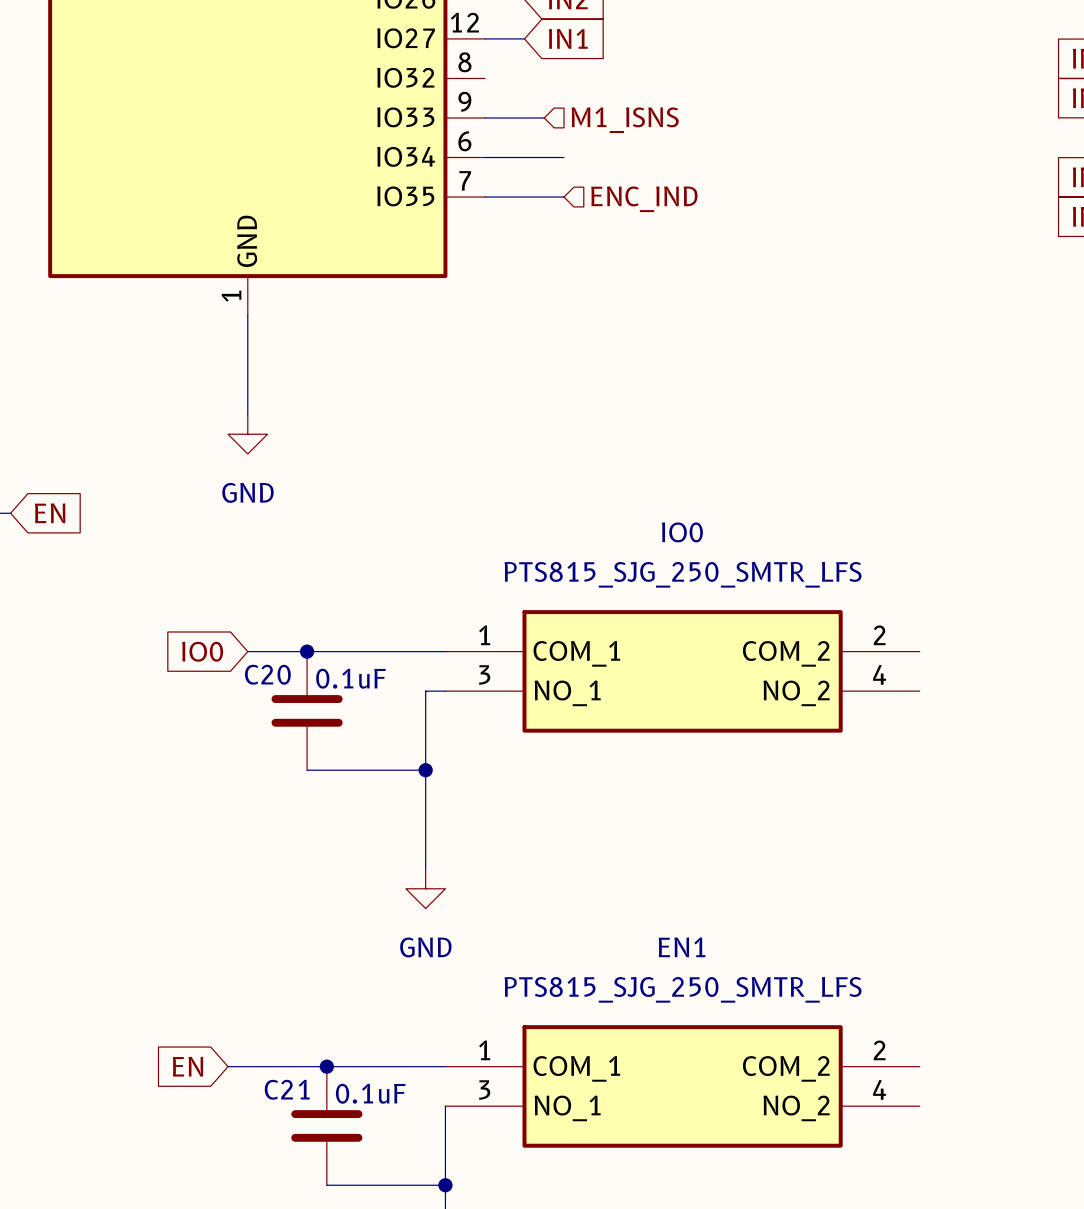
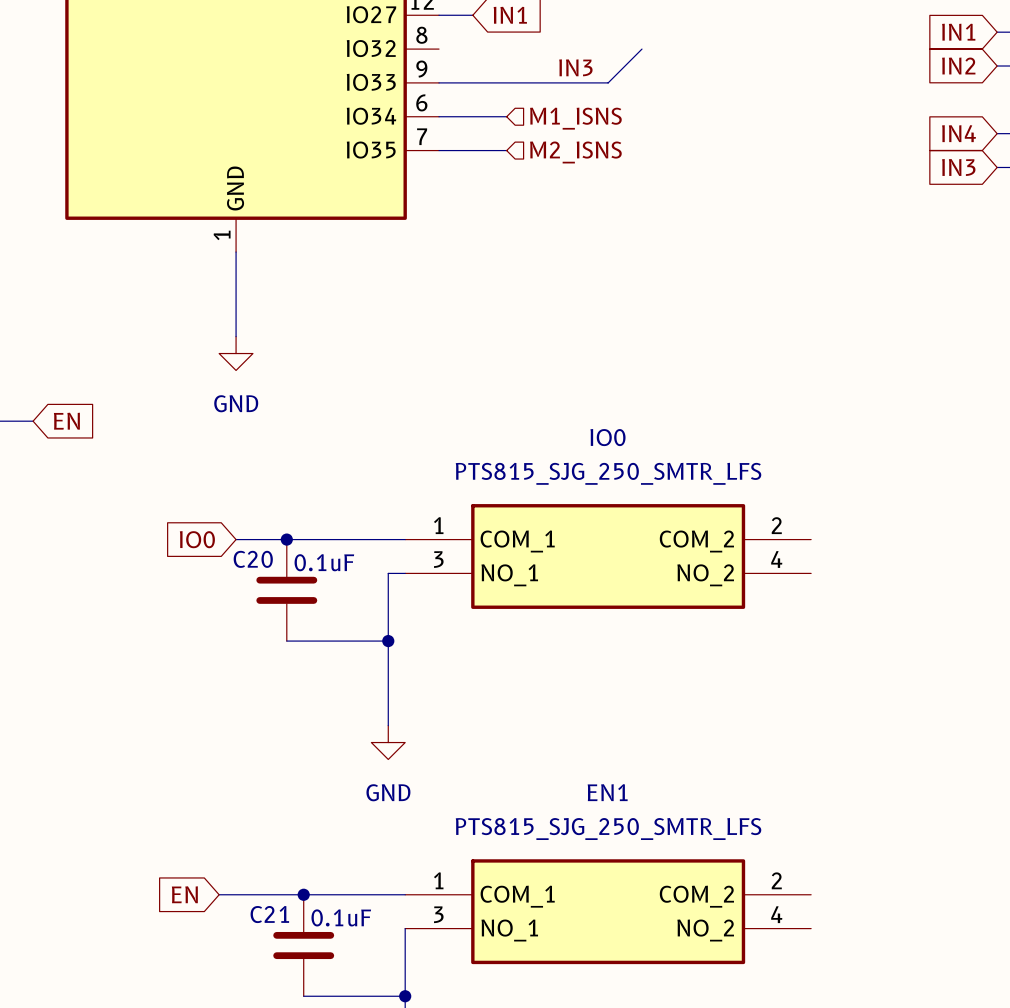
wire: none -> (641, 49) (608, 82) (489, 82)
label: none -> IN3 (575, 67)
hierarchical label position: M1_ISNS (625, 120) -> M1_ISNS (575, 118)
hierarchical label: ENC_IND (644, 199) -> M2_ISNS (575, 152)

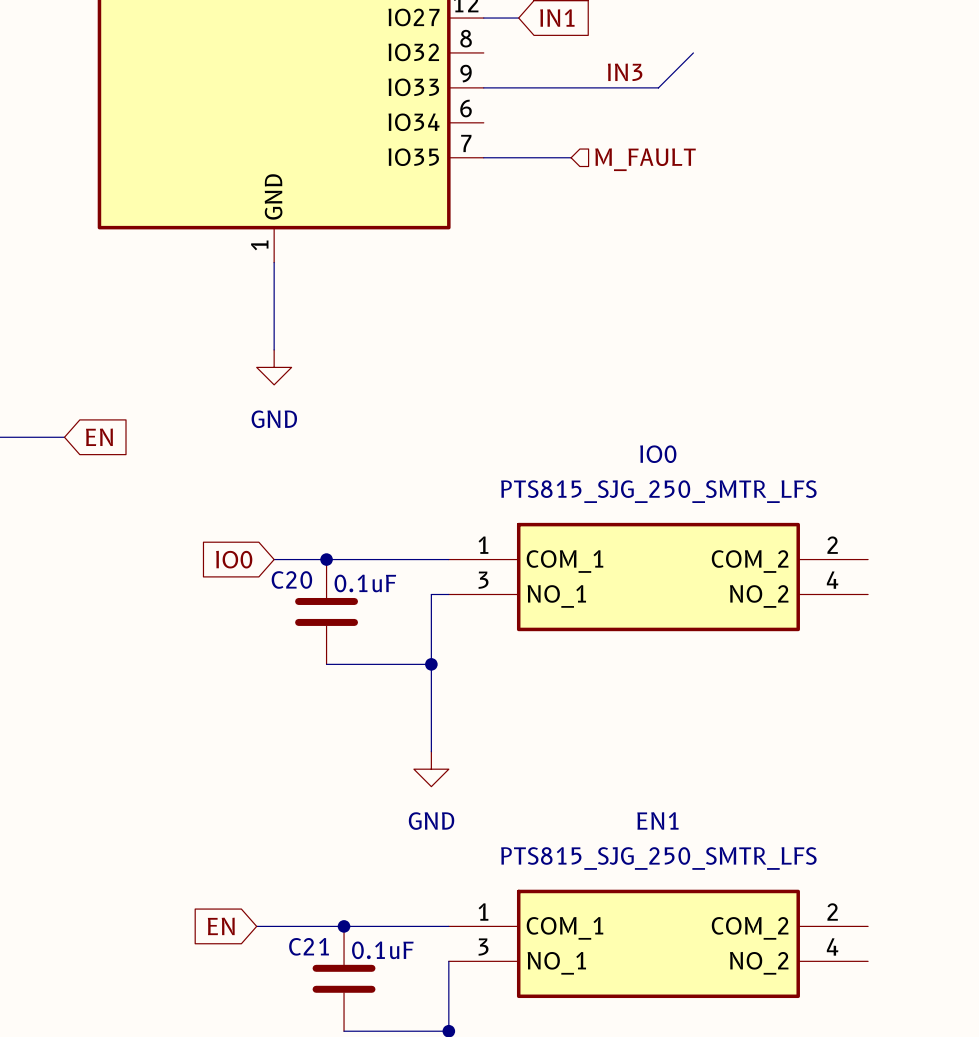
wire: (439, 116) (506, 116) -> none
hierarchical label: M1_ISNS (575, 118) -> none
wire: none -> (553, 157) (571, 157)
hierarchical label: M2_ISNS (575, 152) -> none
hierarchical label: none -> M_FAULT (645, 159)

